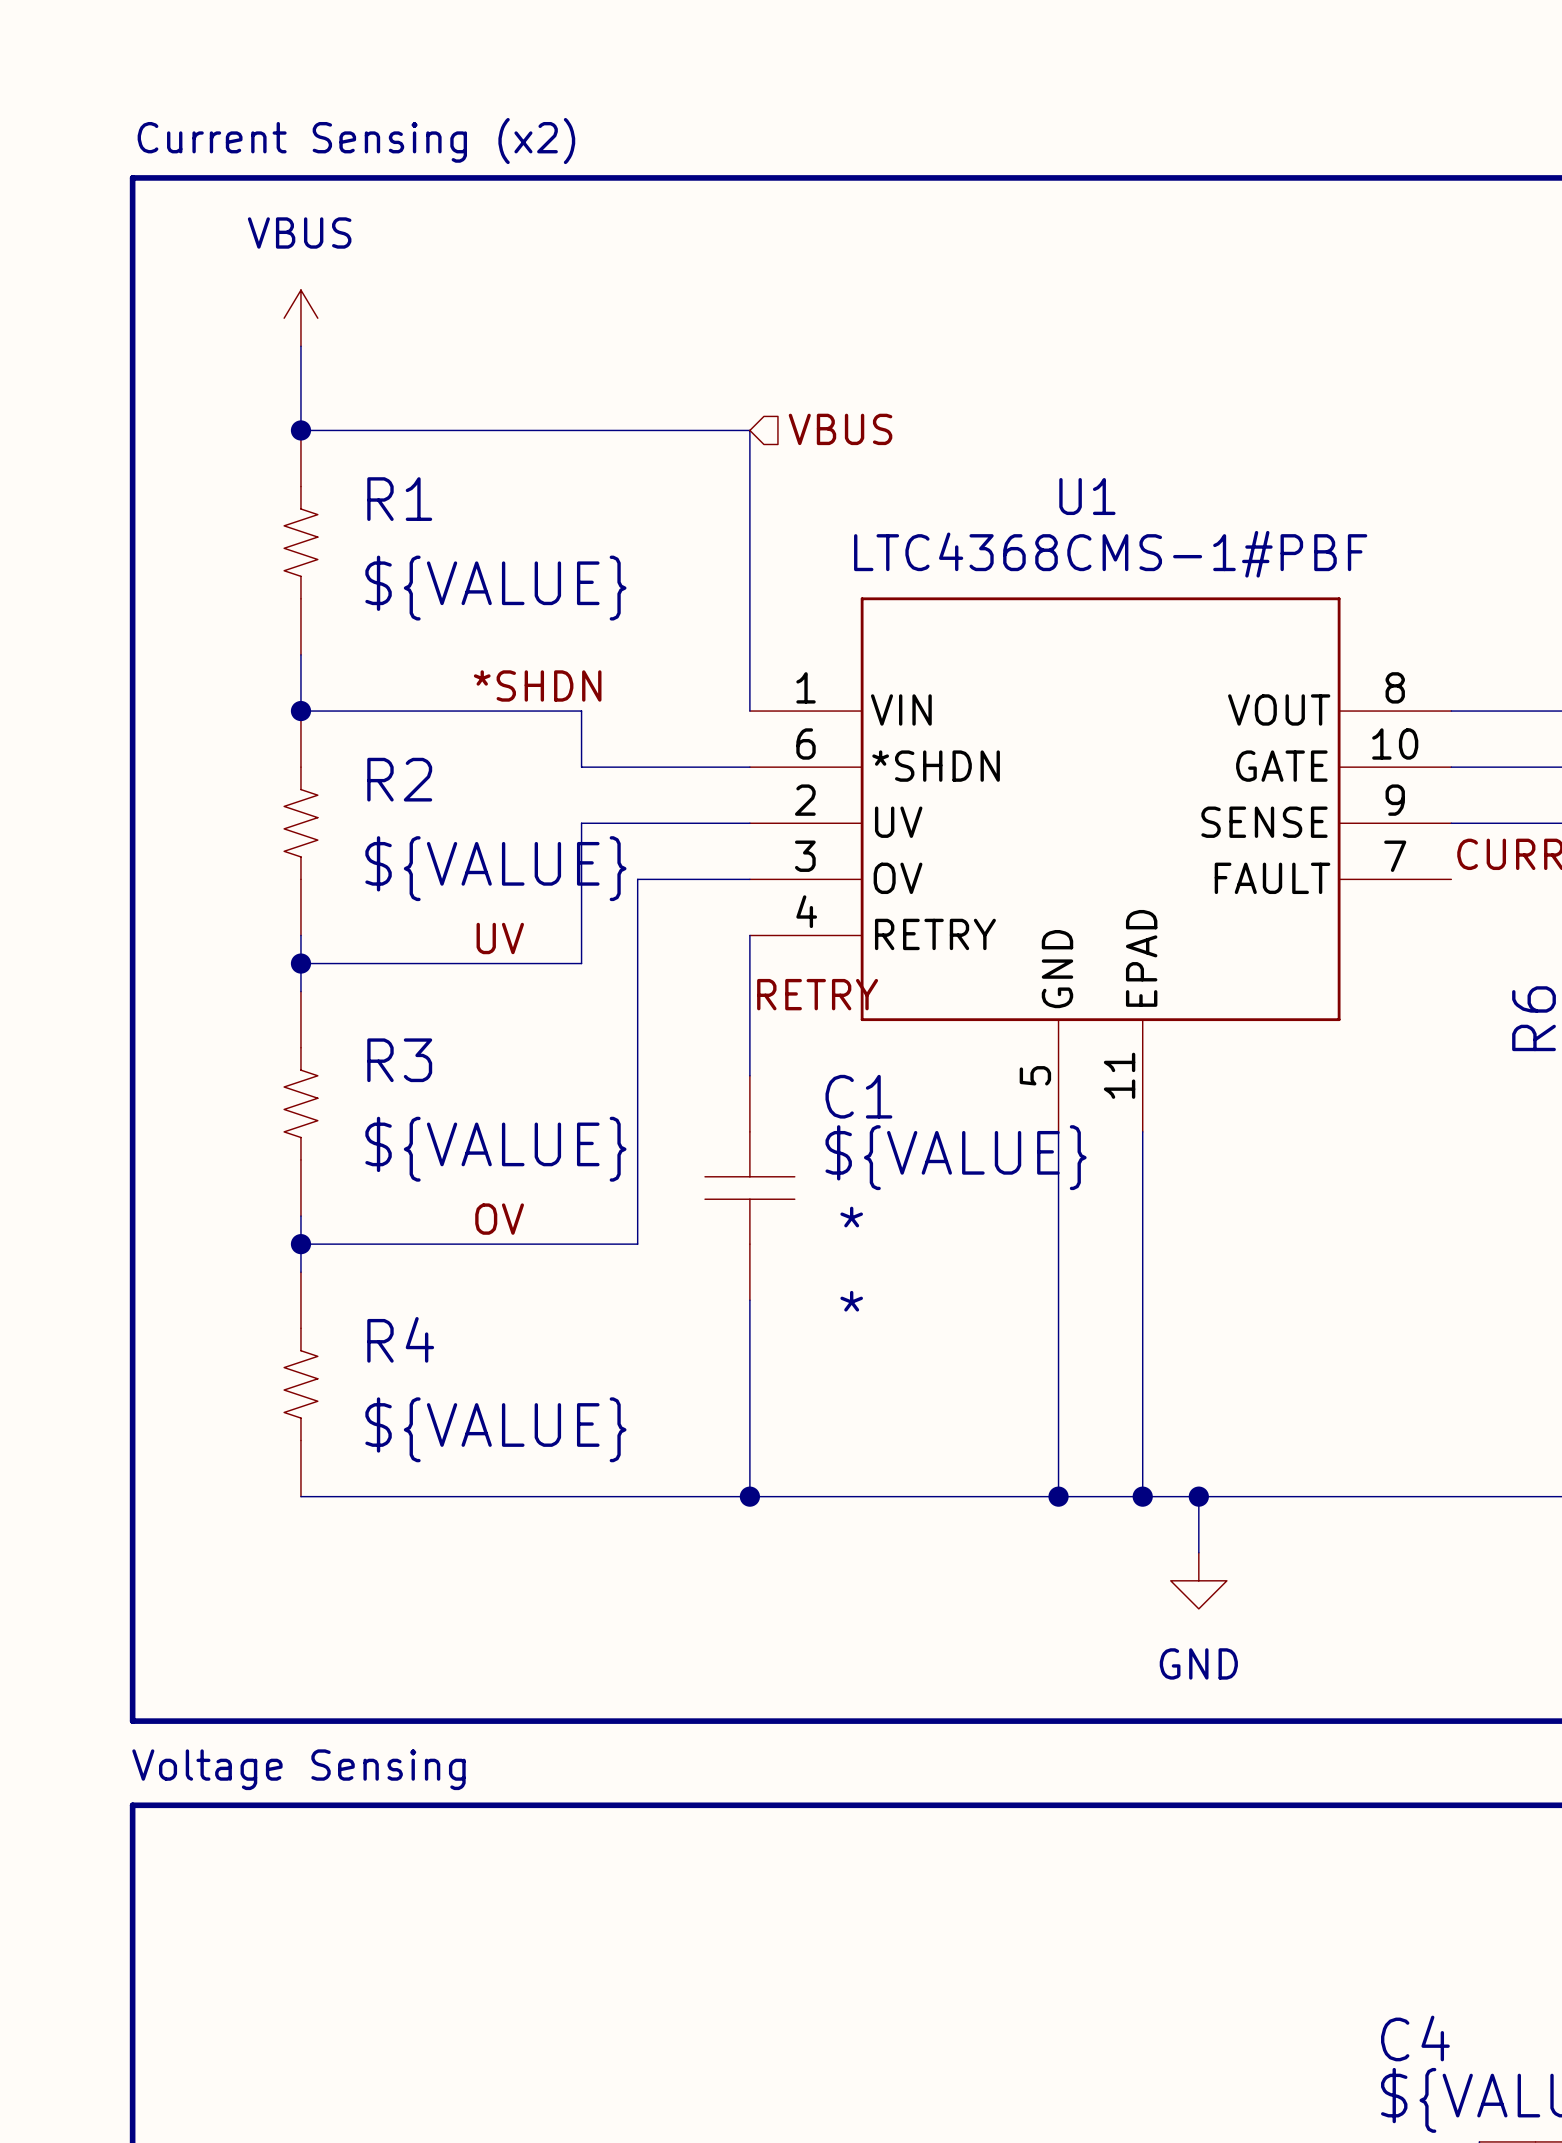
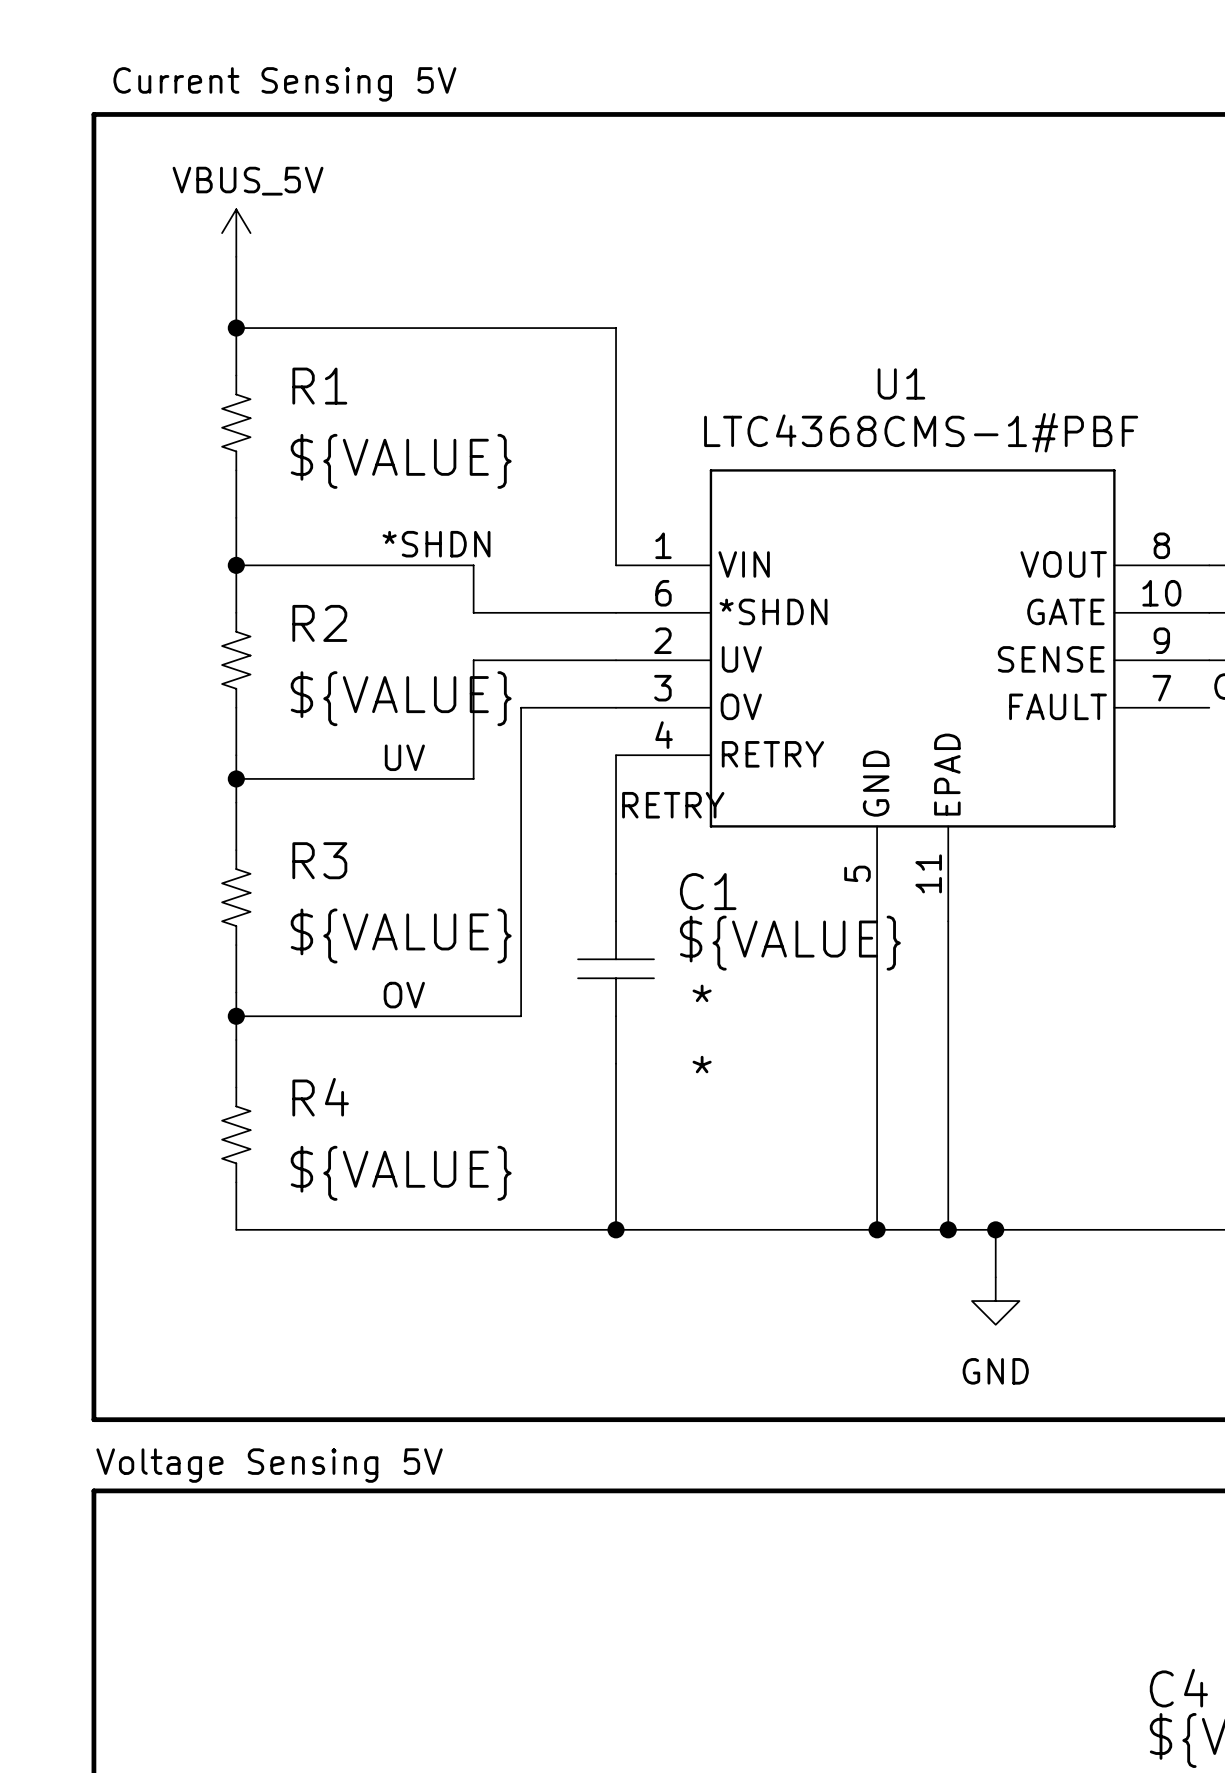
text: Current Sensing (x2) (356, 141) -> Current Sensing 5V (284, 84)
power symbol: VBUS (300, 318) -> VBUS_5V (236, 233)
hierarchical label: VBUS (840, 429) -> none
text: Voltage Sensing (298, 1769) -> Voltage Sensing 5V (269, 1465)

